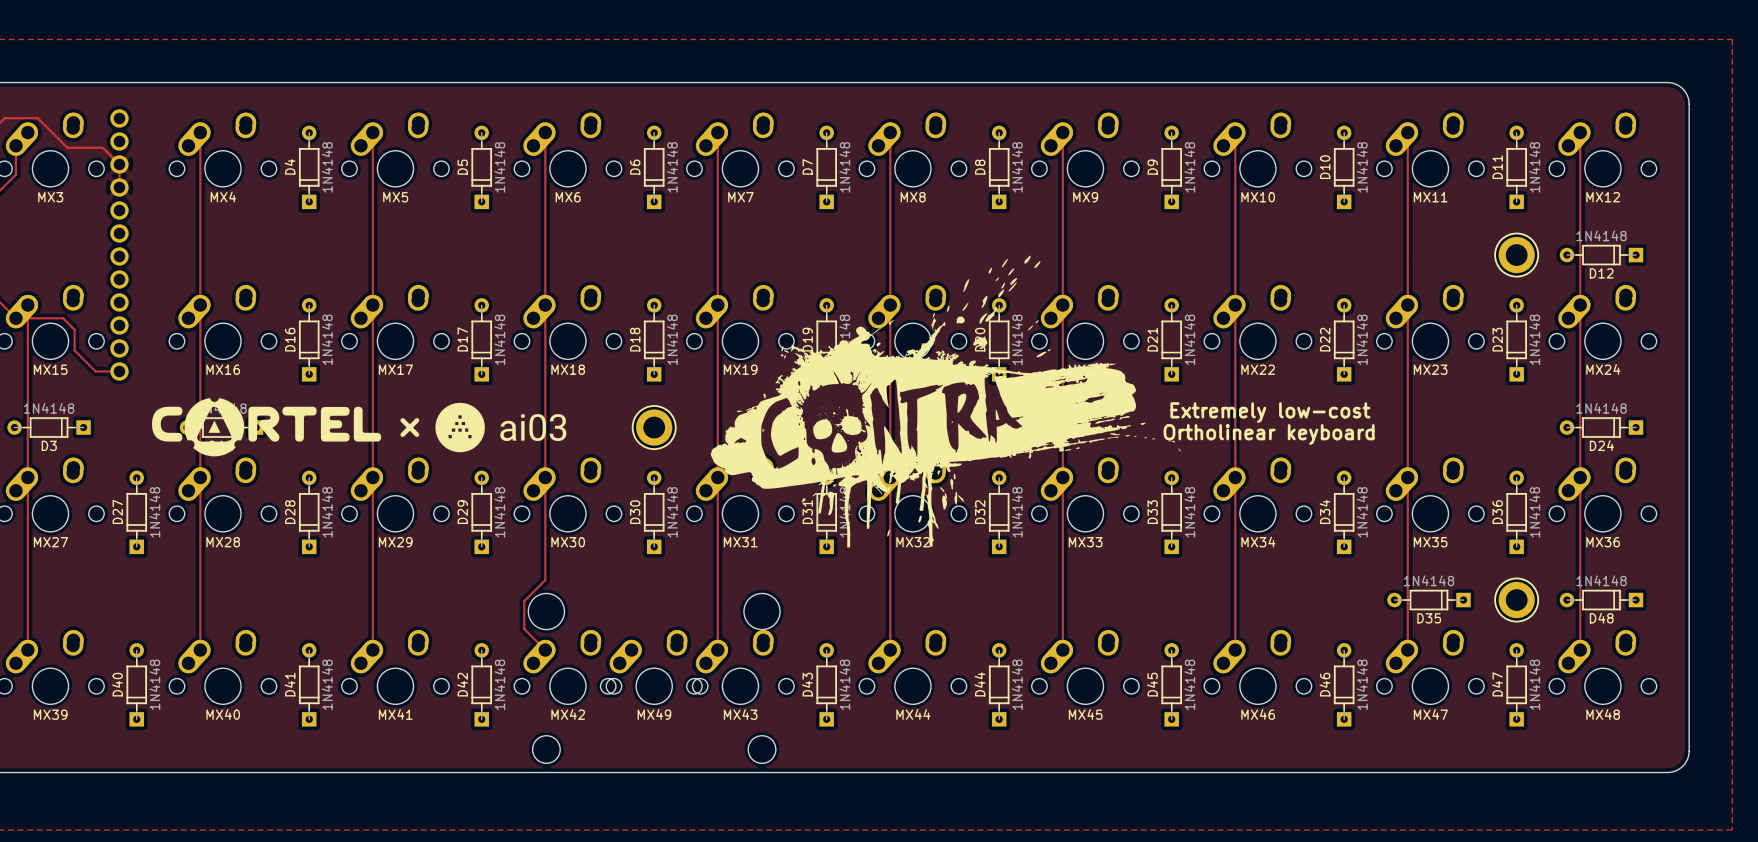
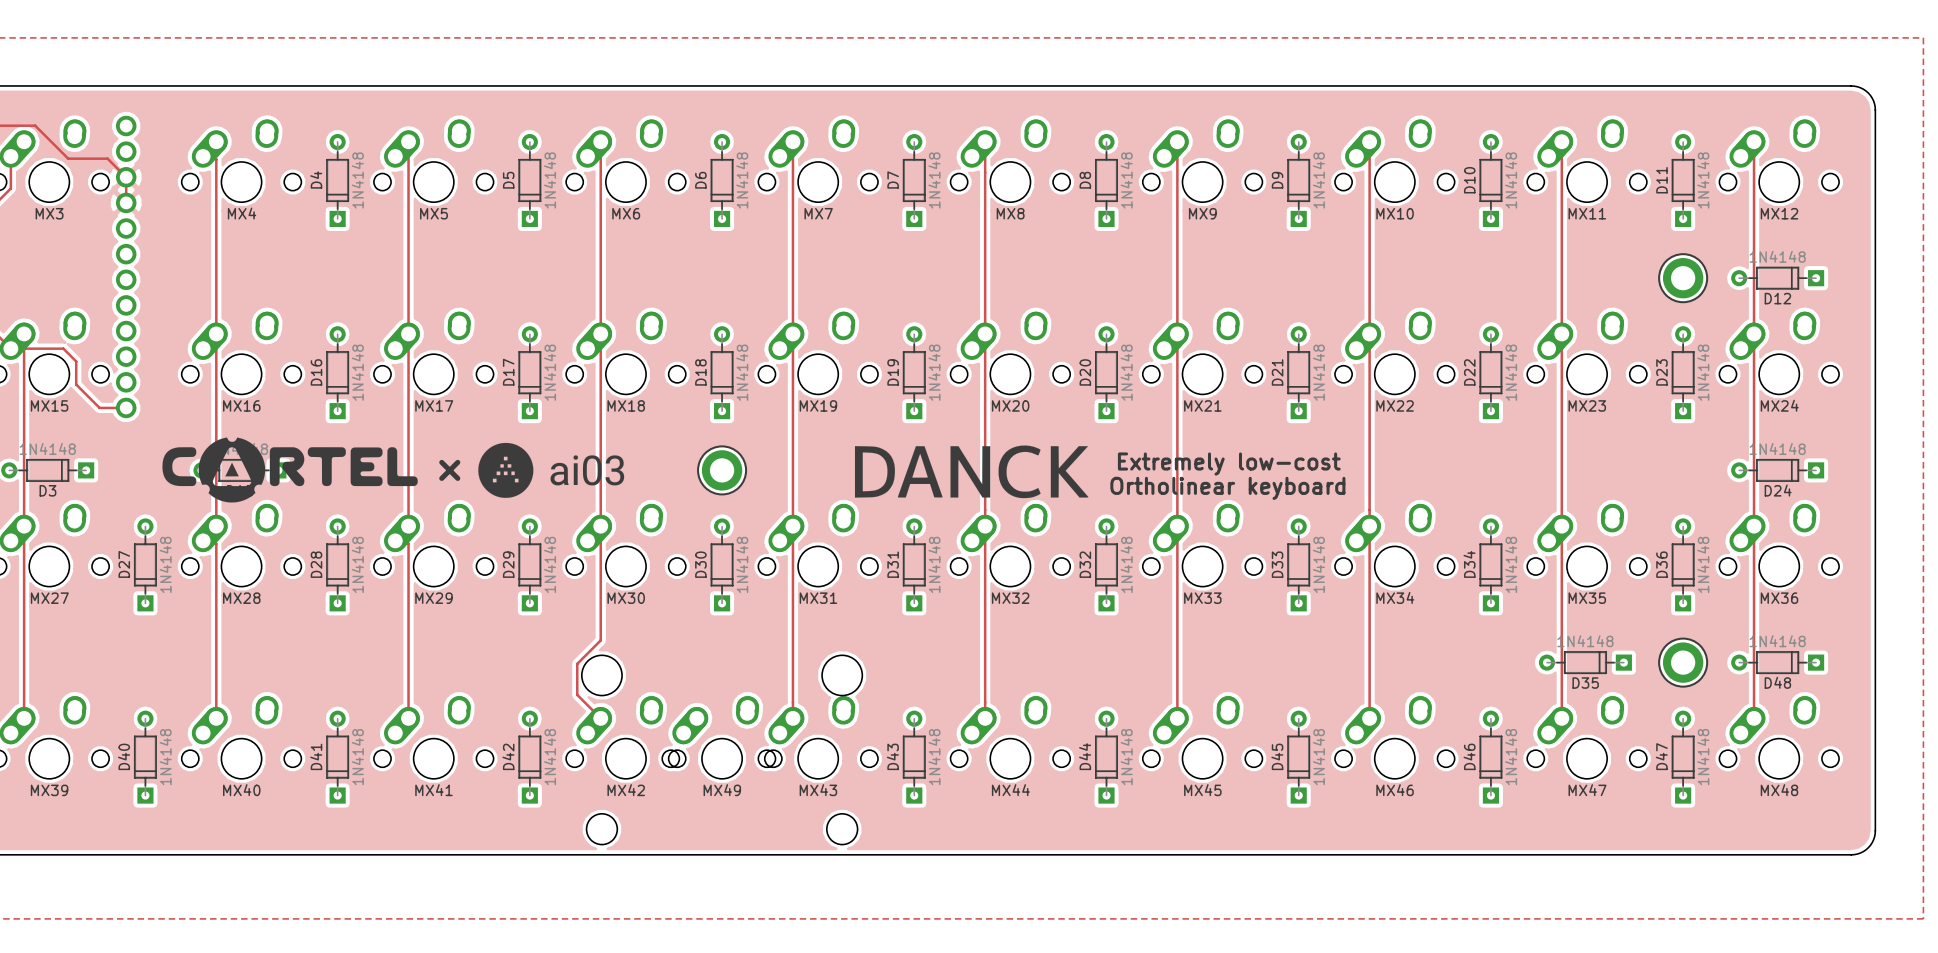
drawing: [710, 255, 1181, 548] -> none
drawing: none -> [854, 445, 1089, 499]
text position: Extremely low-cost (1270, 412) -> Extremely low-cost (1229, 464)
text position: Ortholinear keyboard (1269, 434) -> Ortholinear keyboard (1227, 488)

